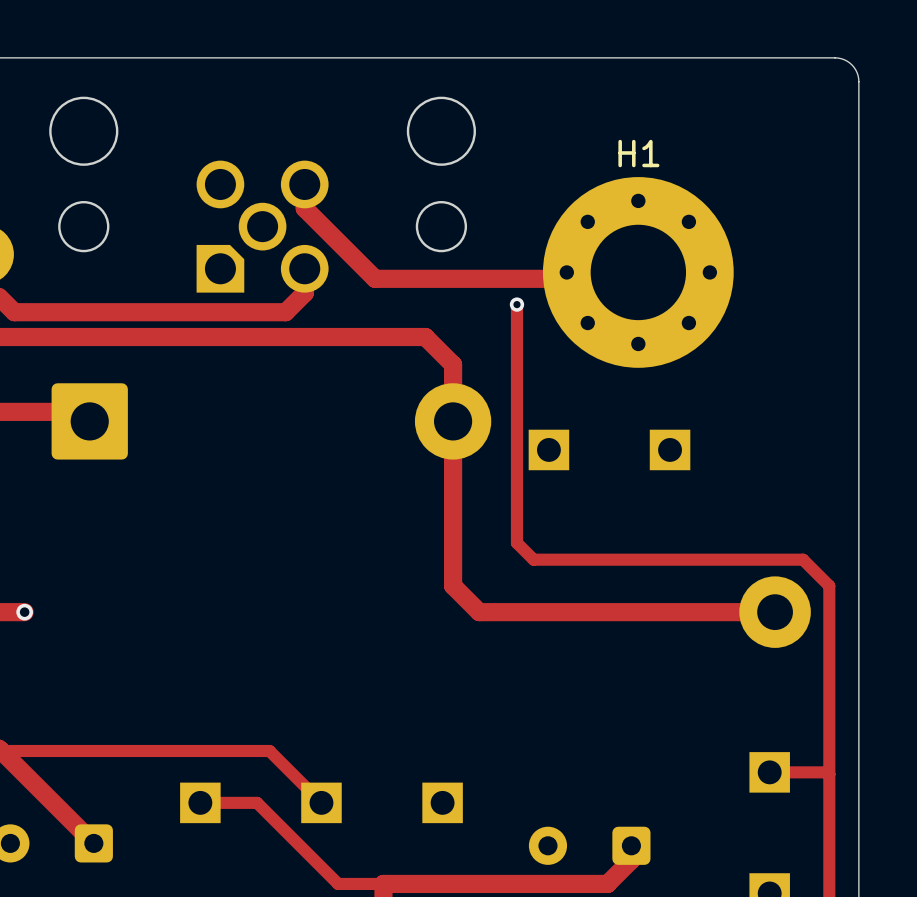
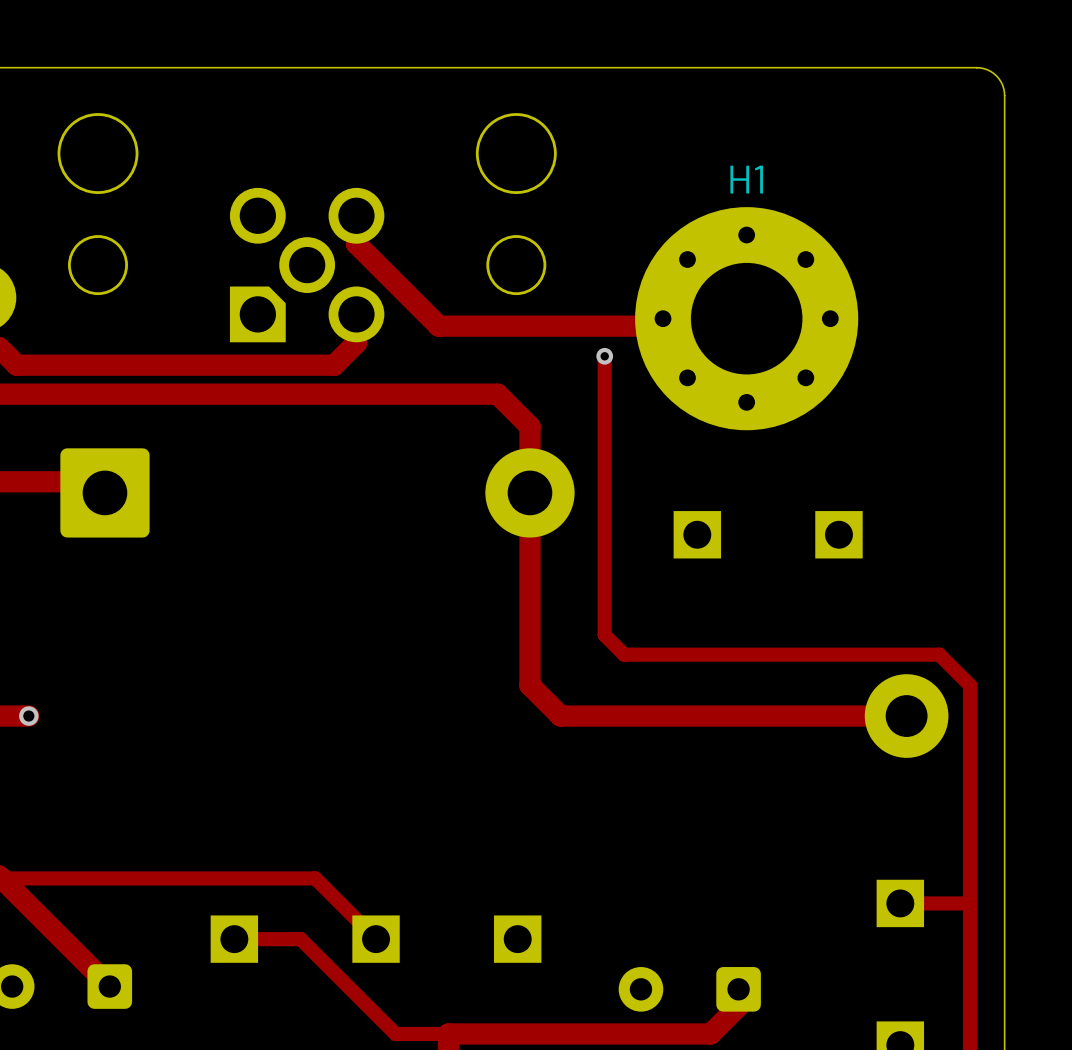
part: (548, 449) -> none
part: (670, 449) -> none
part: none -> (697, 534)
part: none -> (838, 534)

